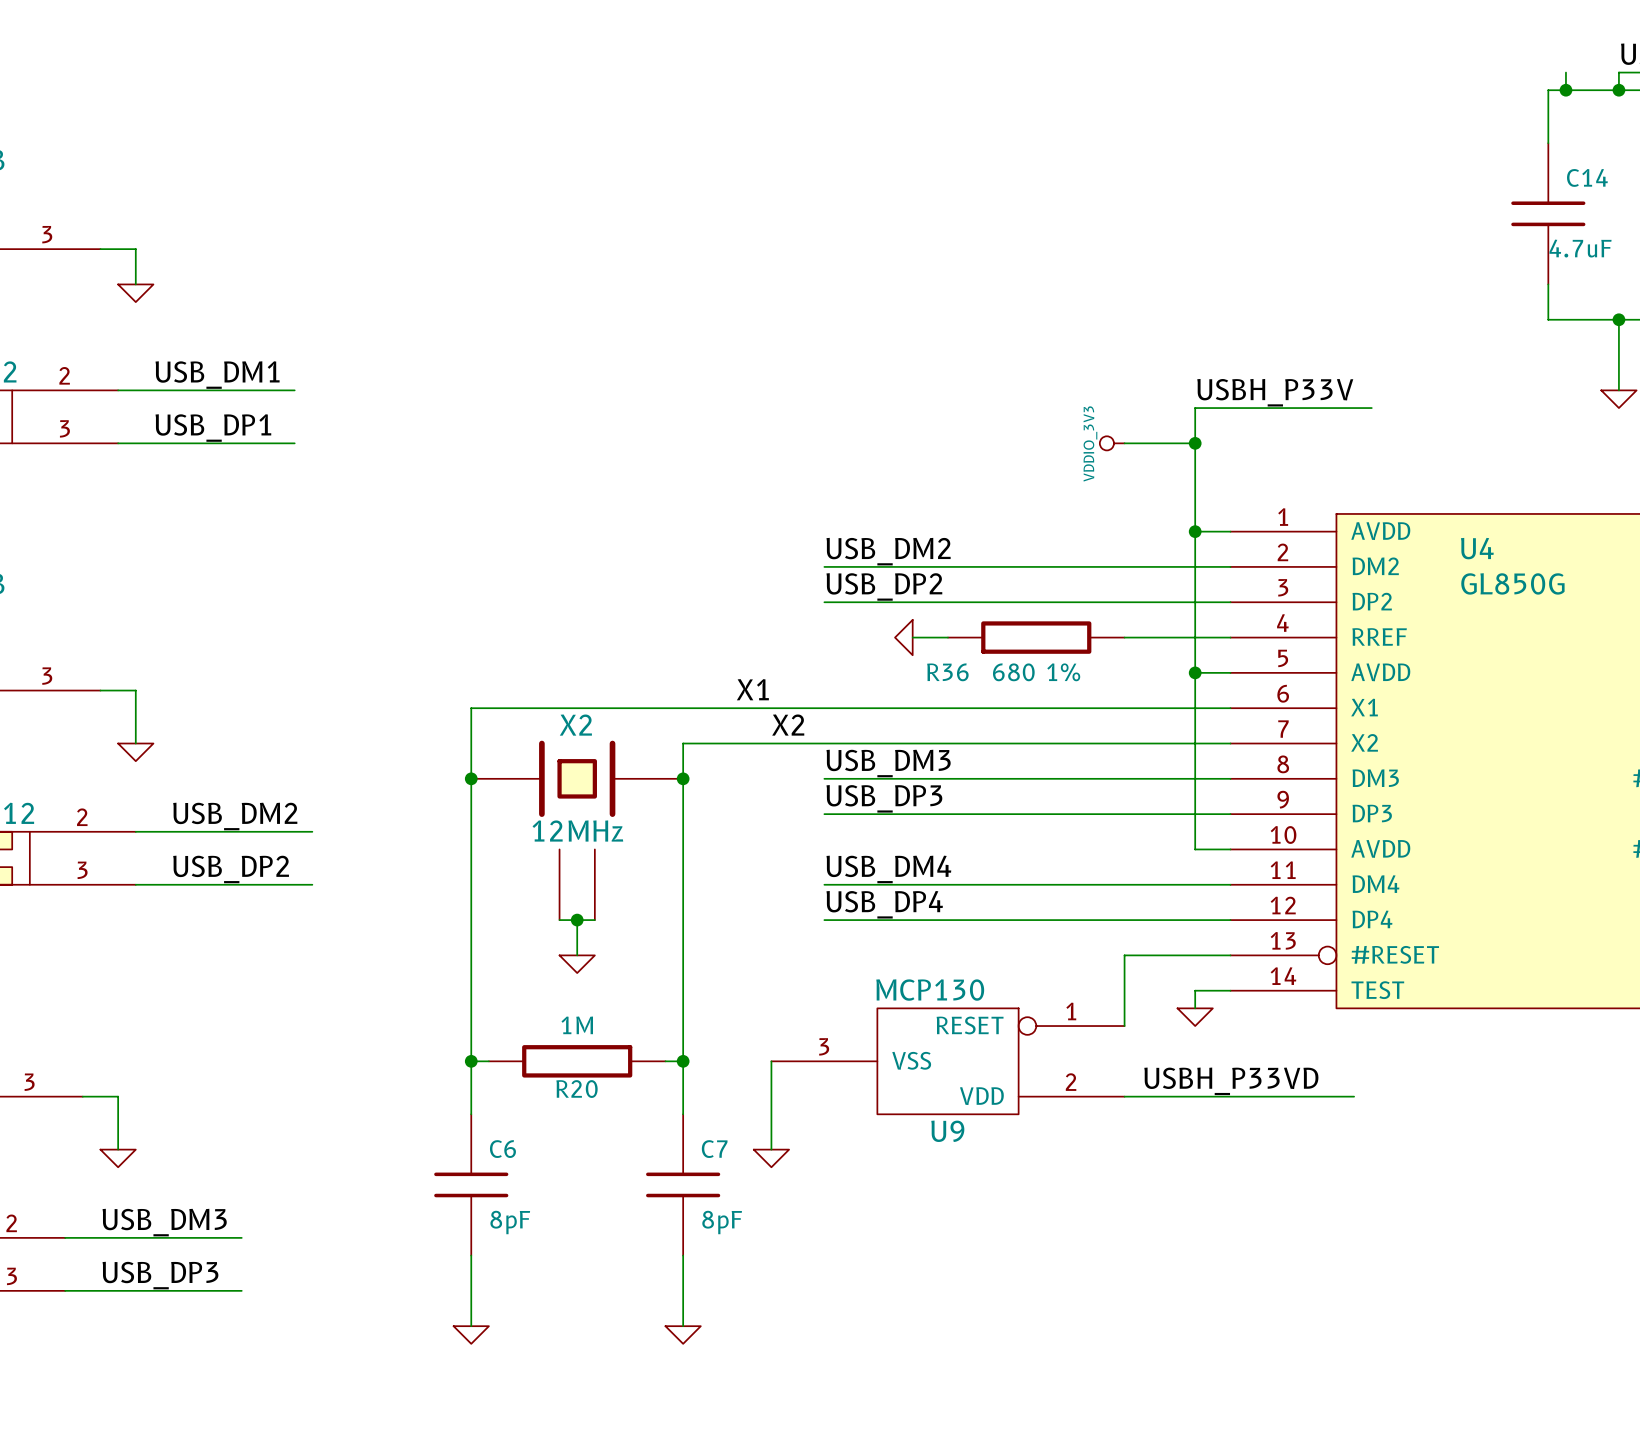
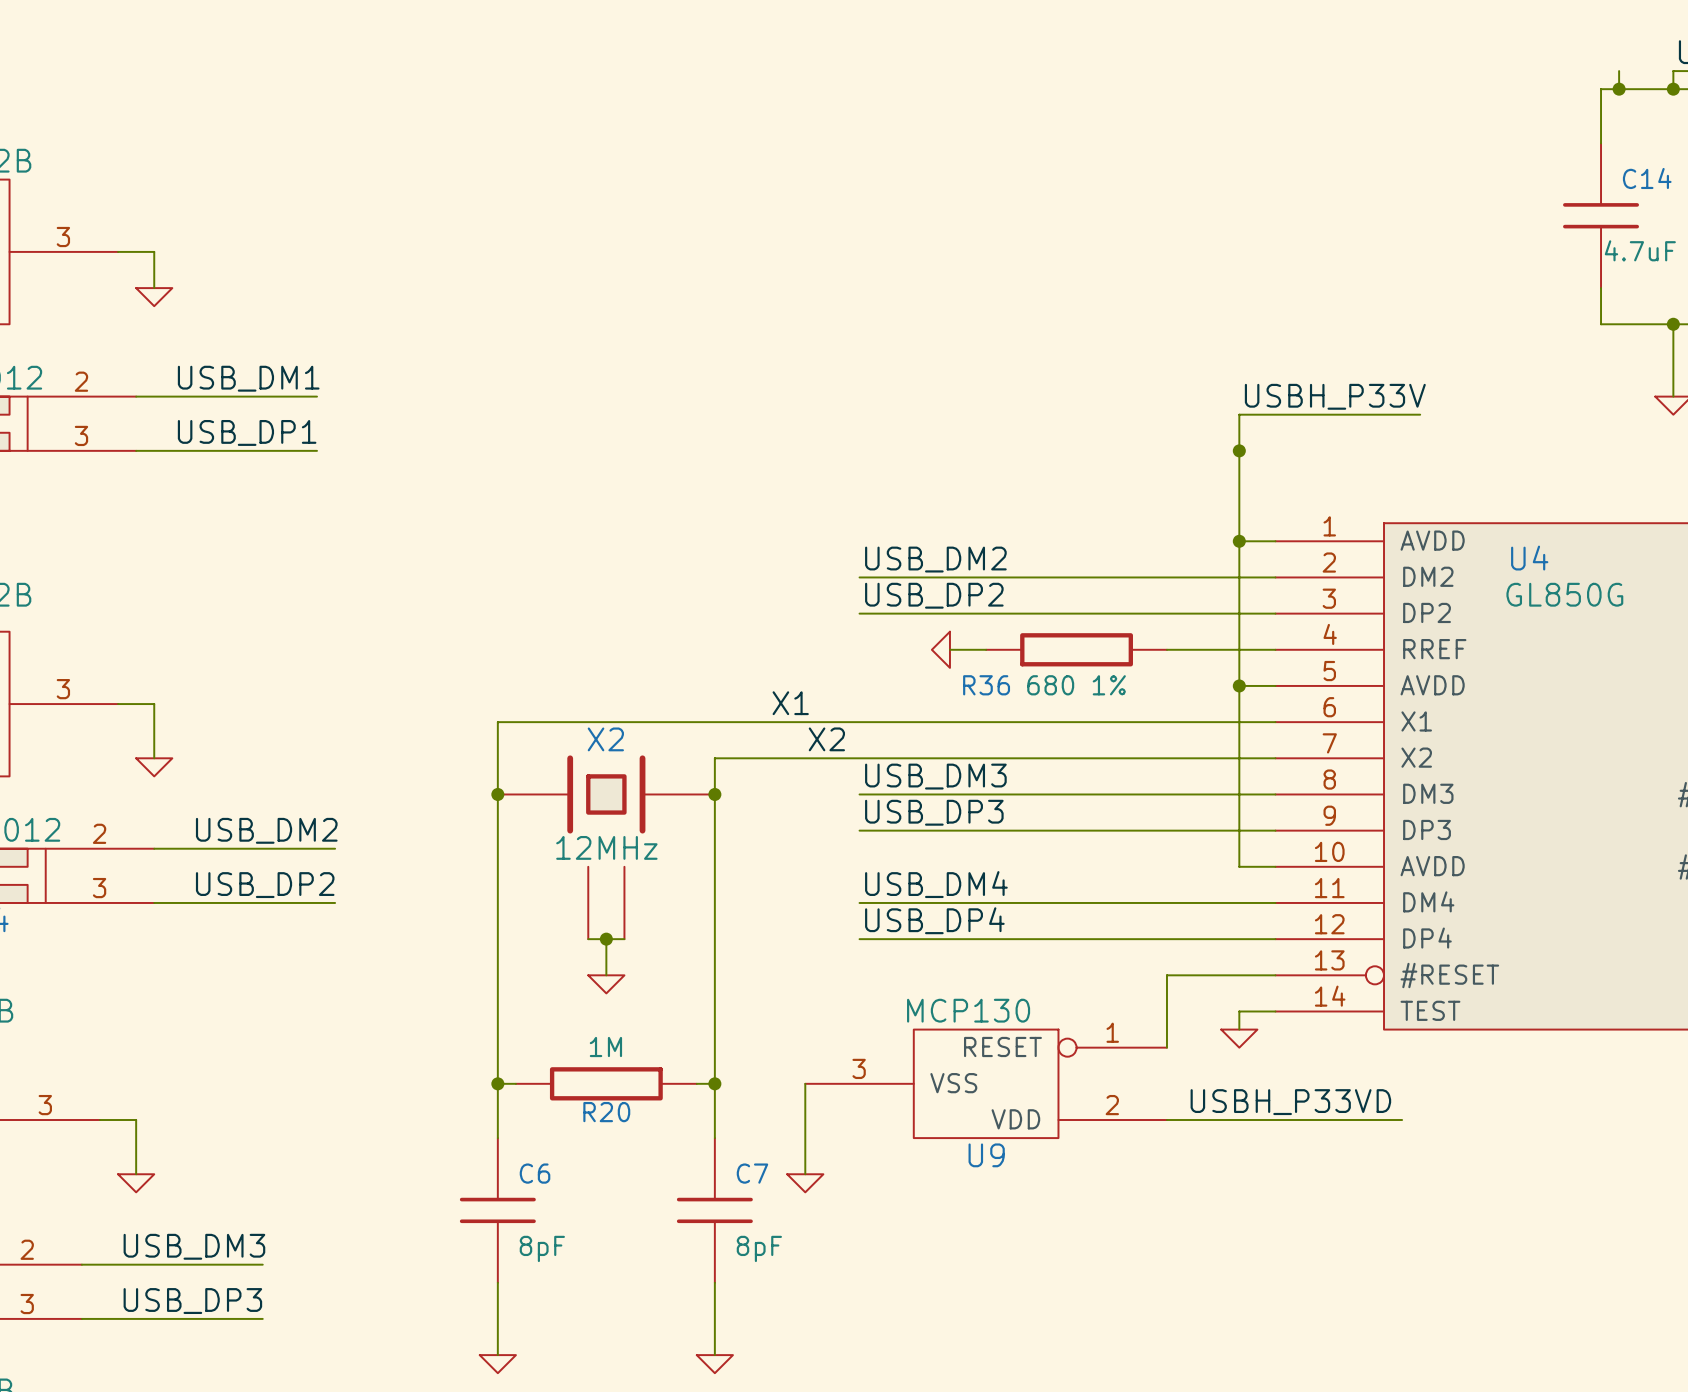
power symbol: VDDIO_3V3 (1112, 443) -> none
wire: (1124, 443) (1195, 443) -> none

